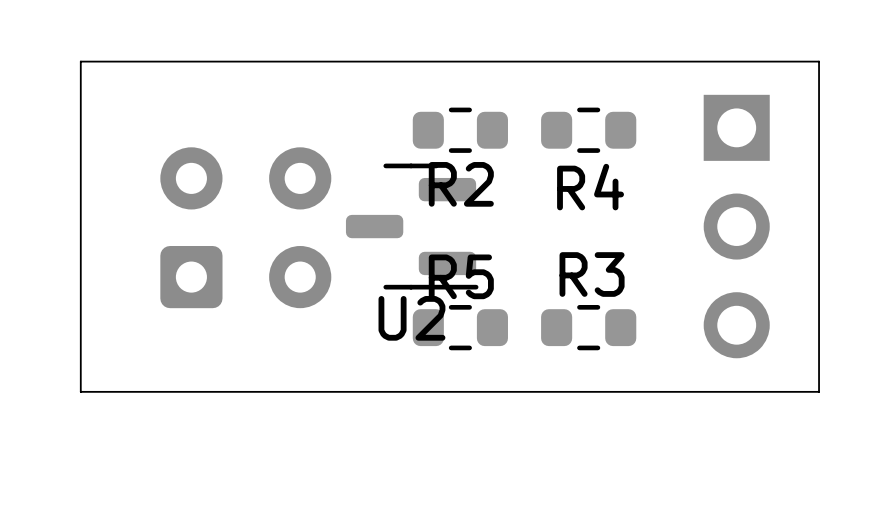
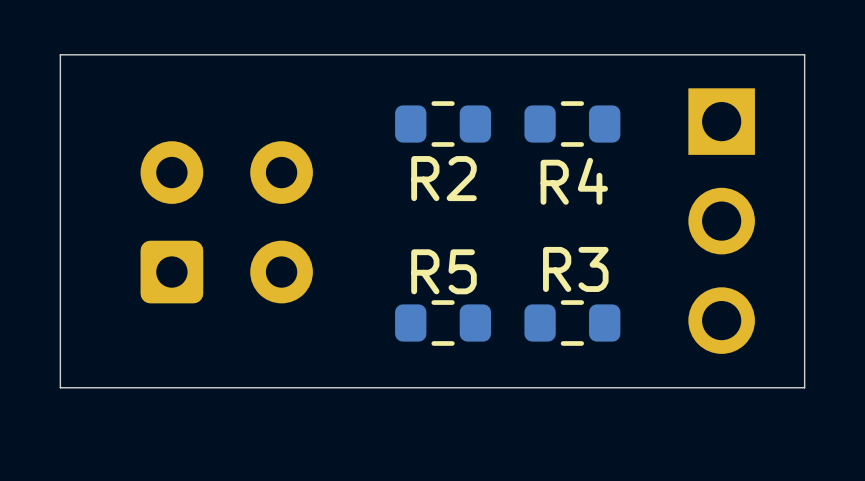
U2: (412, 226) -> none

